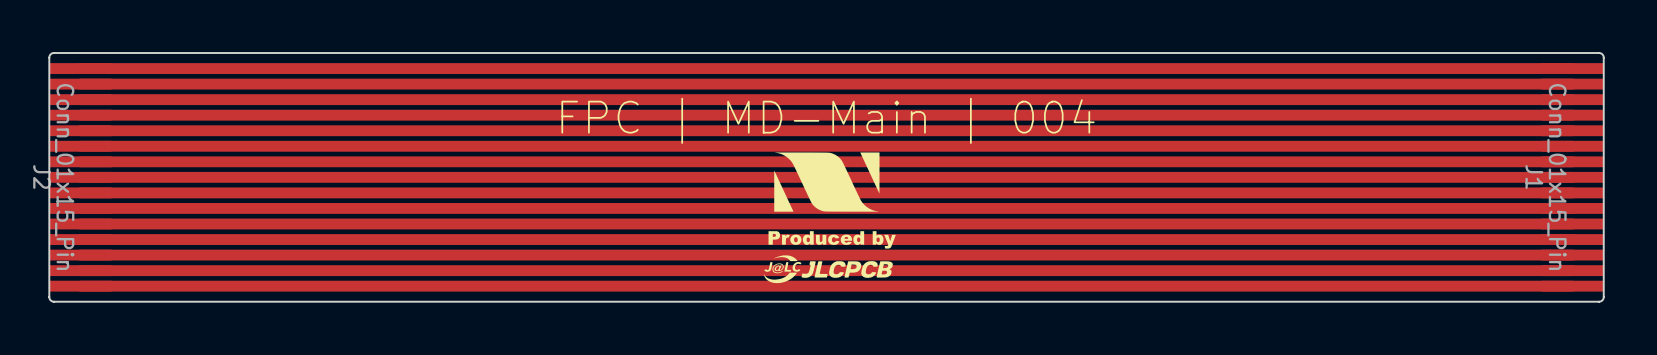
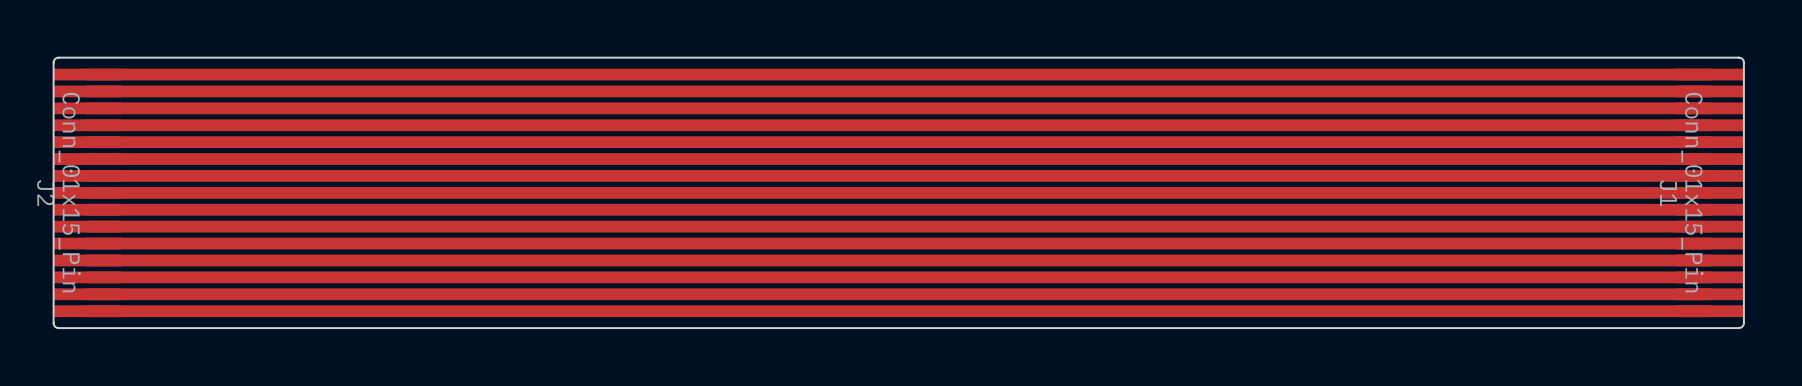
text: FPC | MD-Main | 004 (828, 120) -> none
drawing: [774, 152, 880, 212] -> none
drawing: [763, 231, 896, 284] -> none

